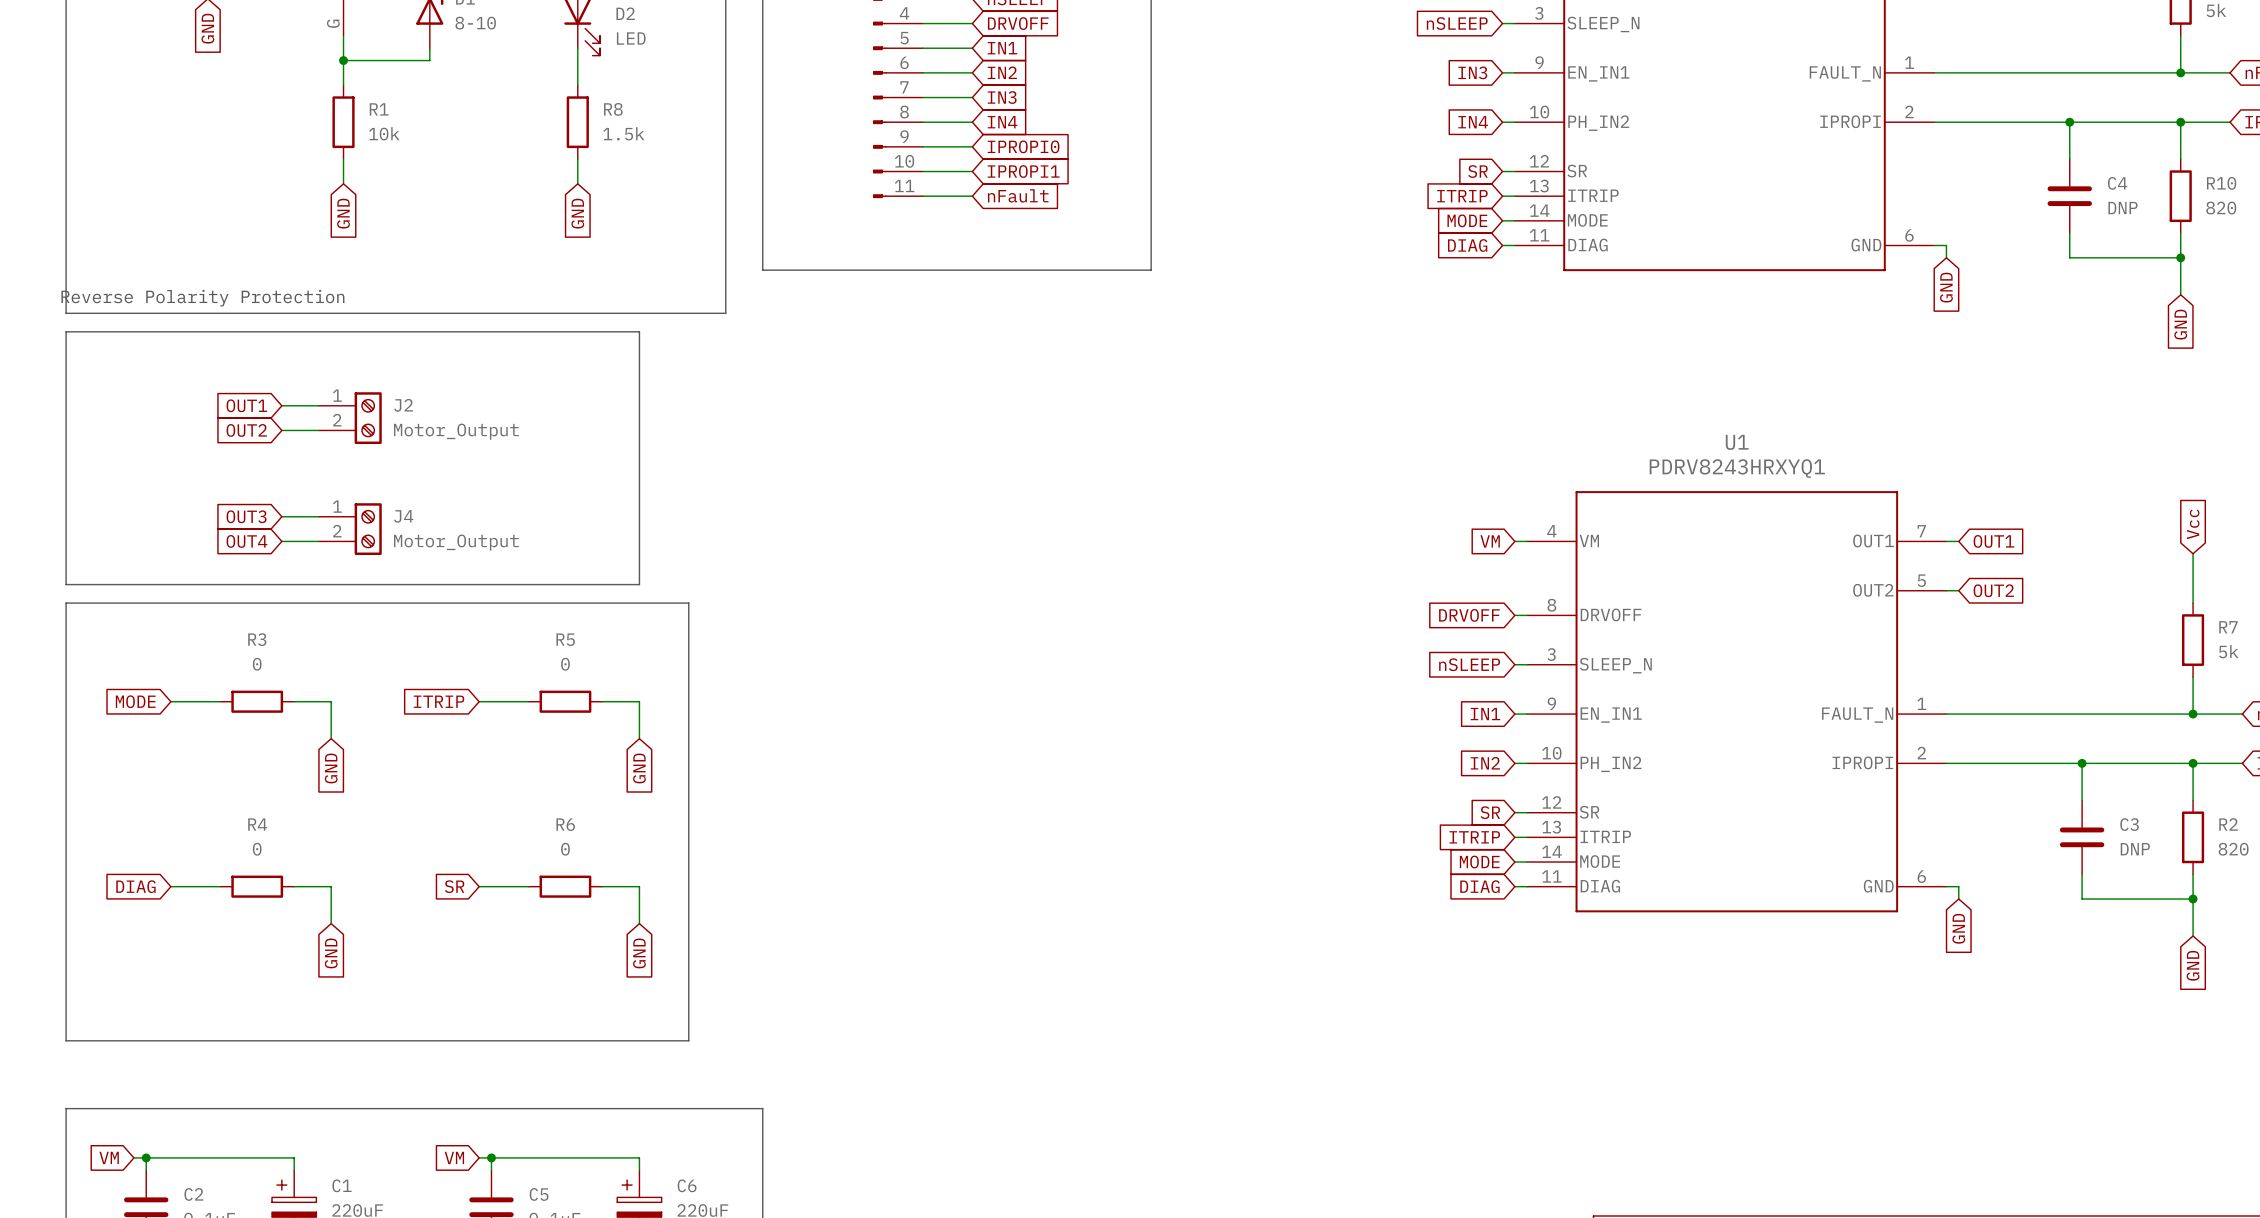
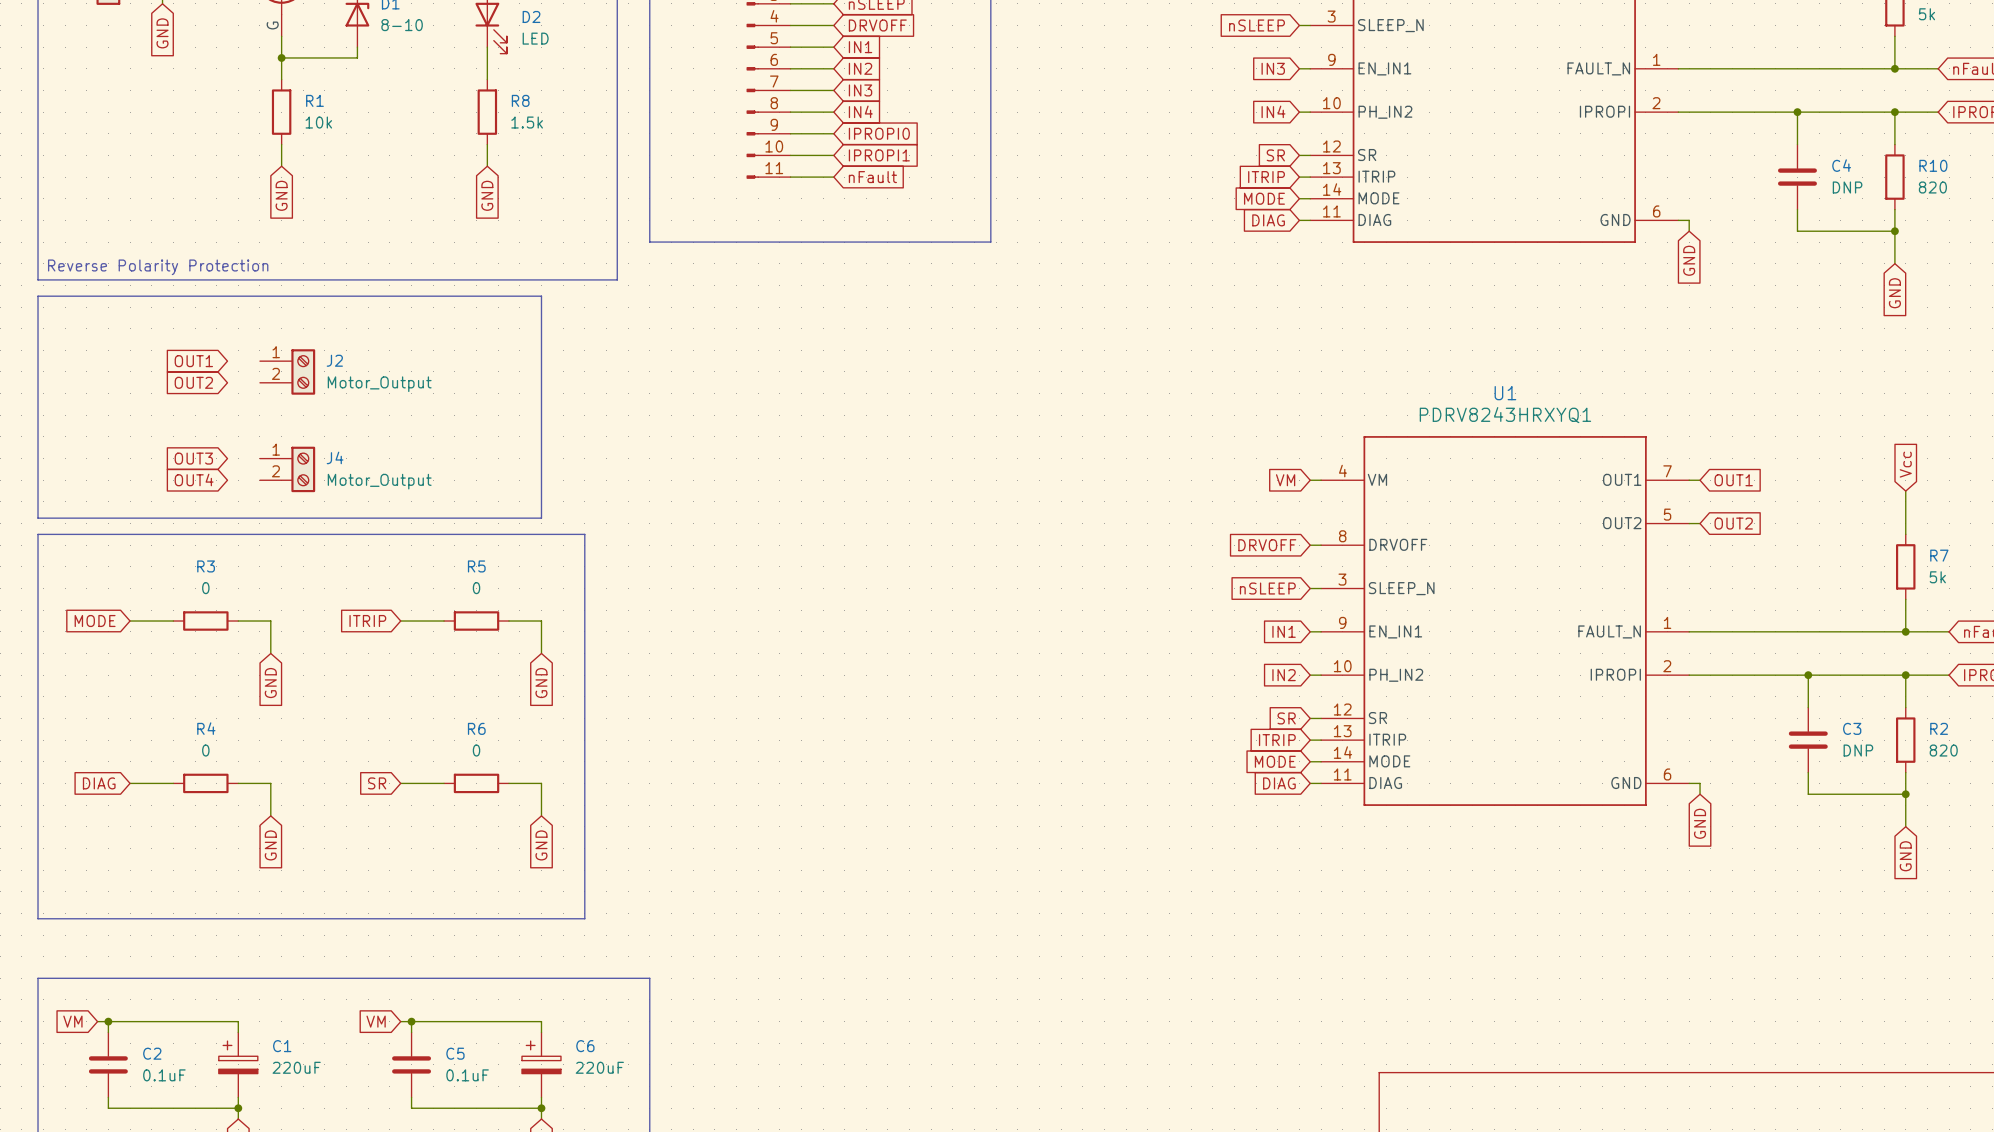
wire: (281, 405) (318, 405) -> none
wire: (281, 430) (318, 430) -> none
wire: (281, 516) (318, 516) -> none
wire: (281, 541) (318, 541) -> none

